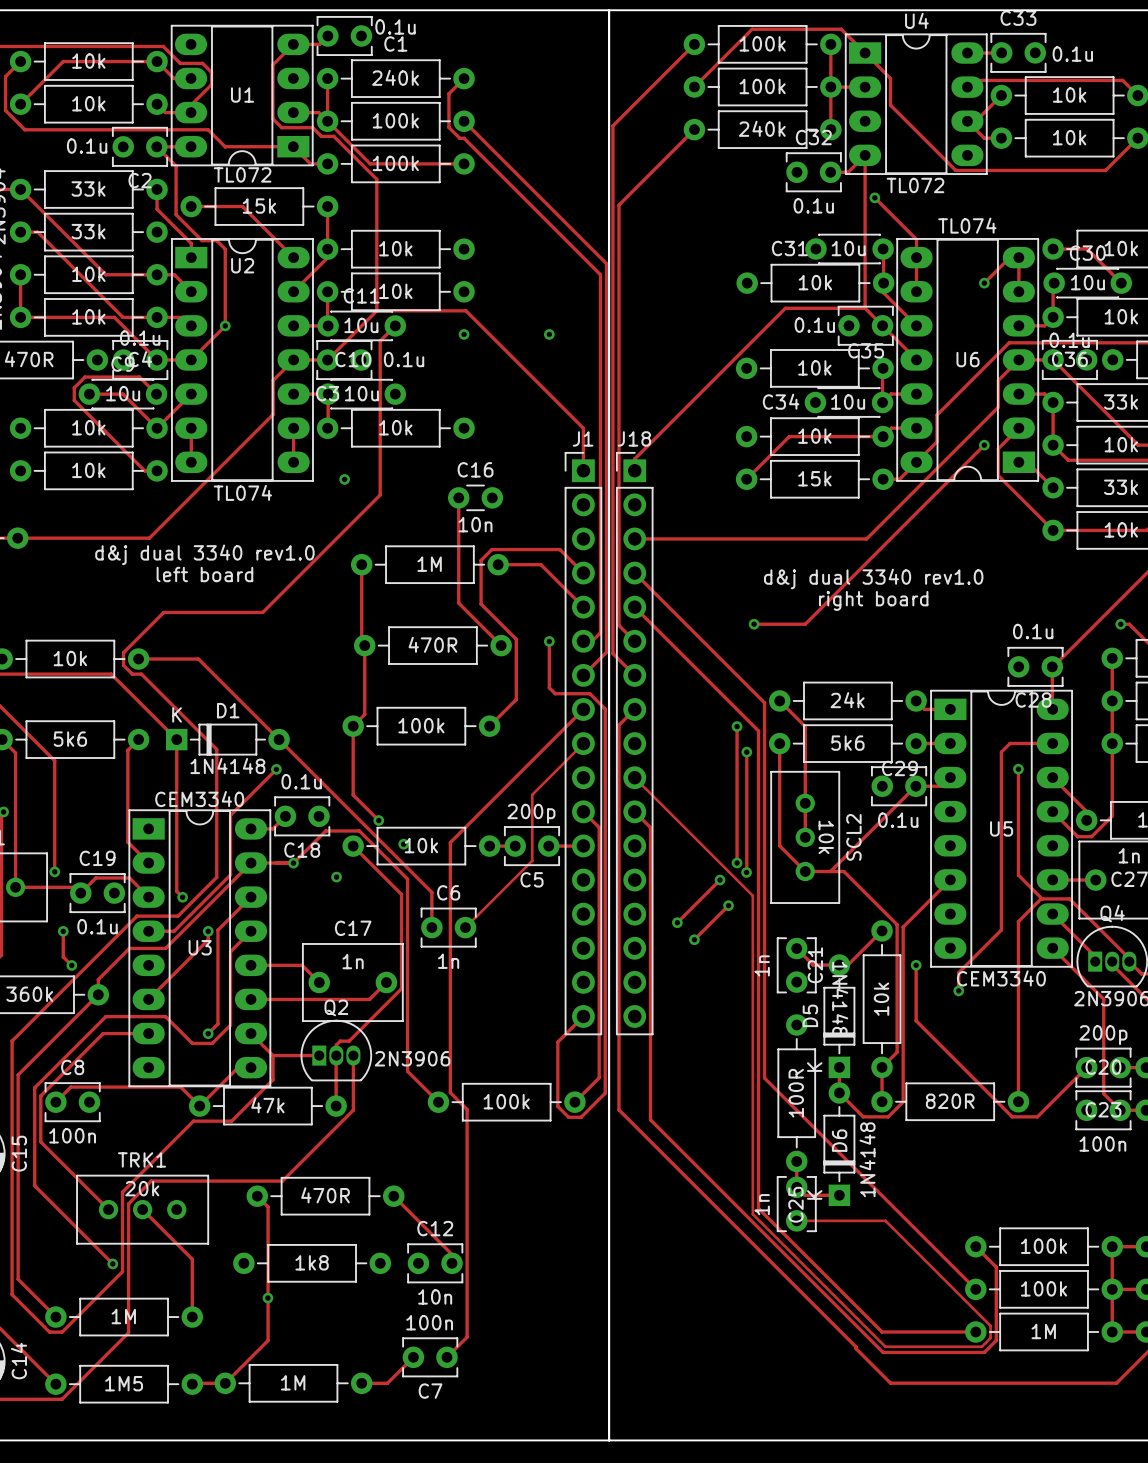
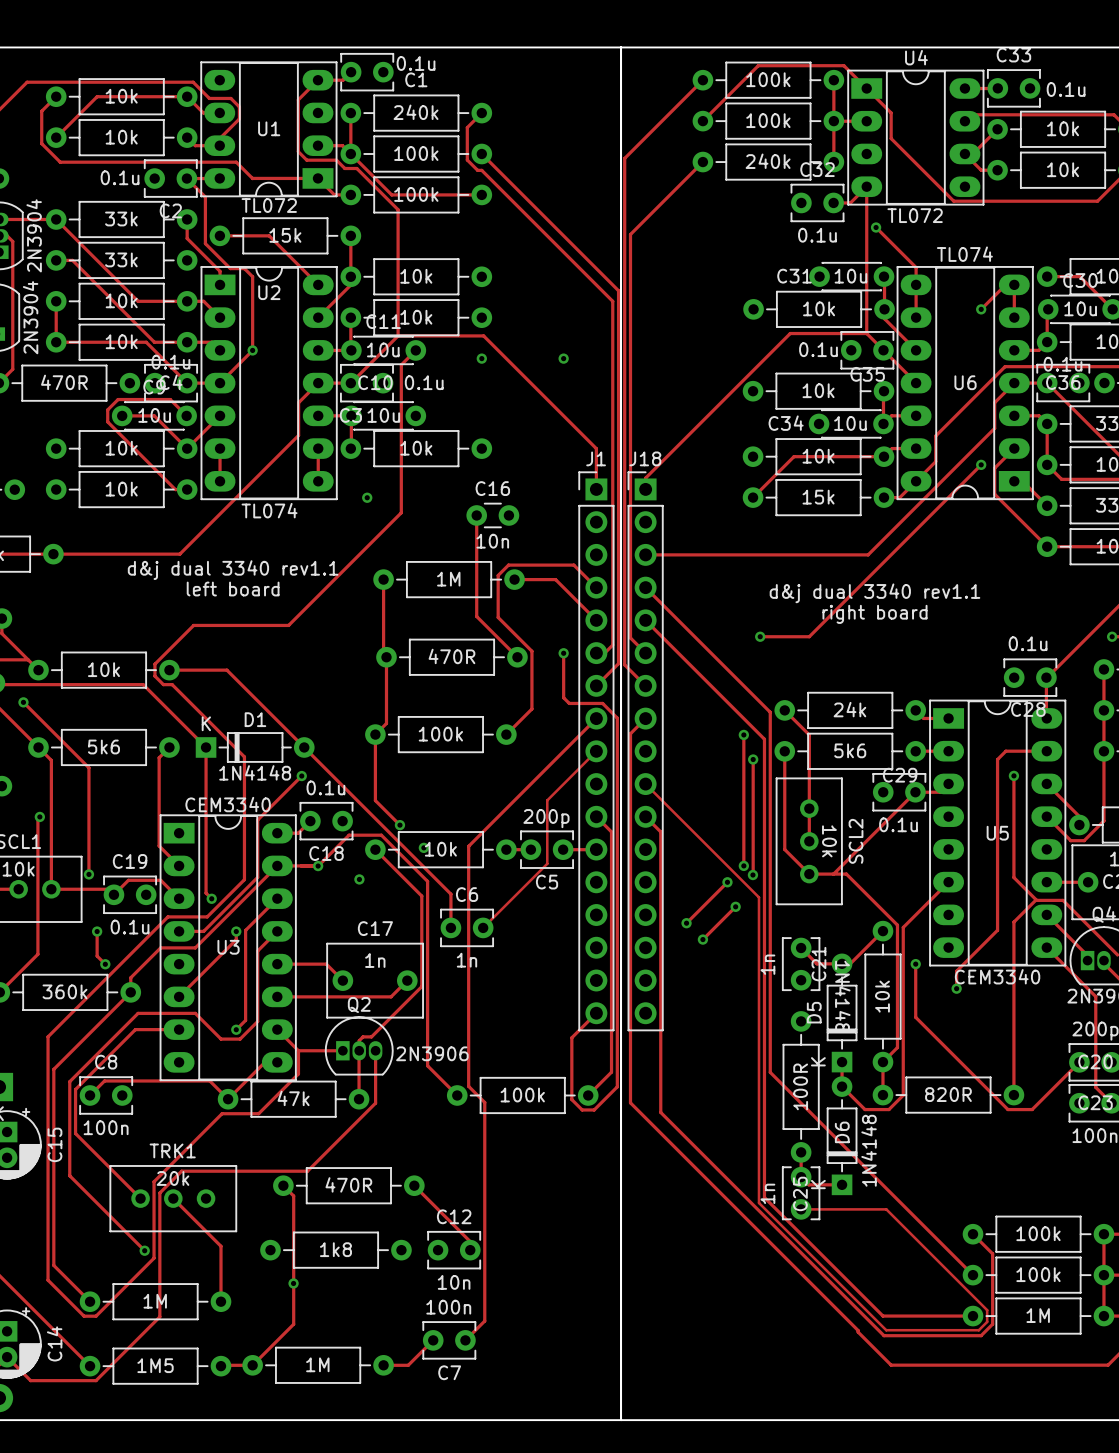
text: d&j dual 3340 rev1.0 (204, 554) -> d&j dual 3340 rev1.1 (233, 570)
text: d&j dual 3340 rev1.0 (873, 578) -> d&j dual 3340 rev1.1 (874, 593)

